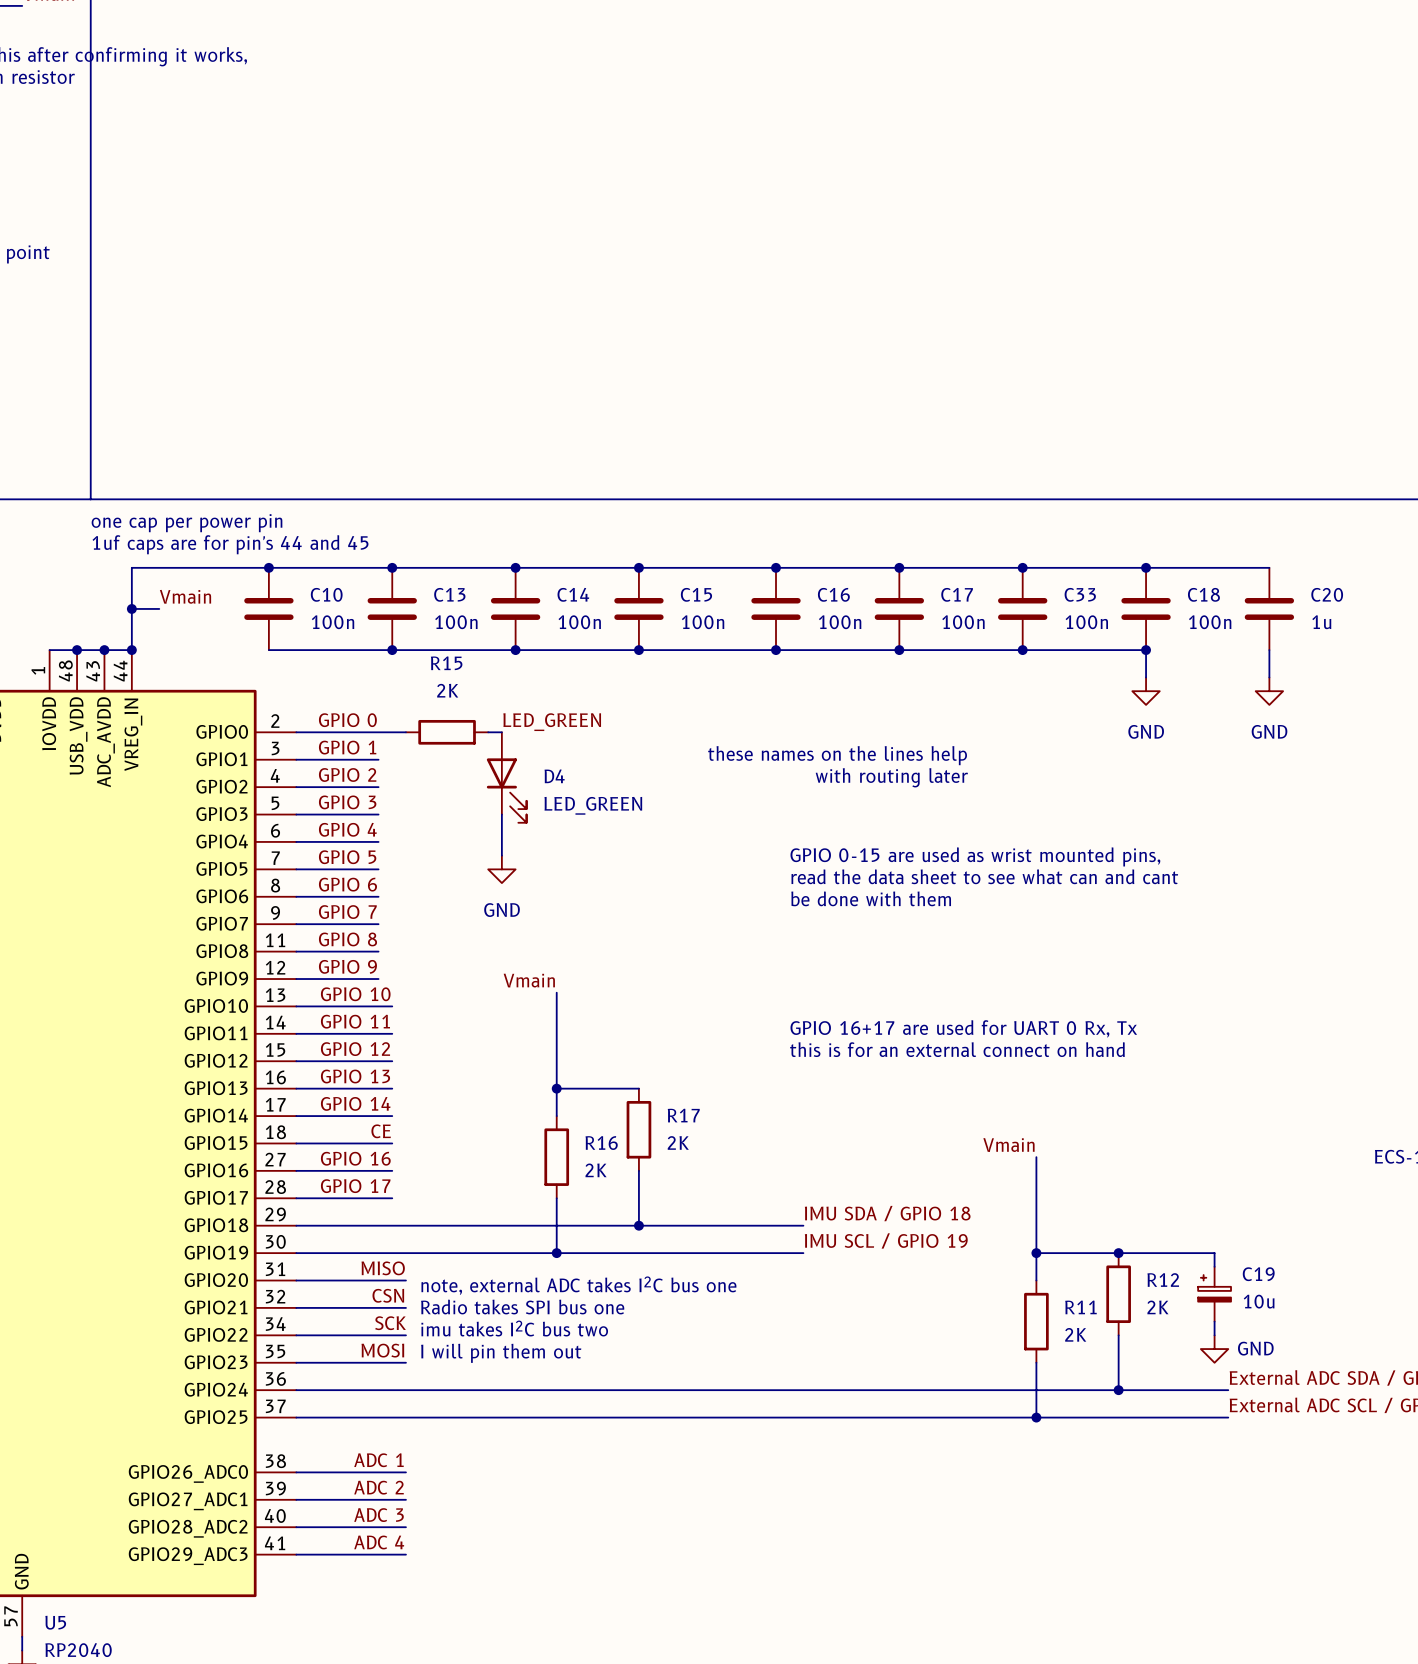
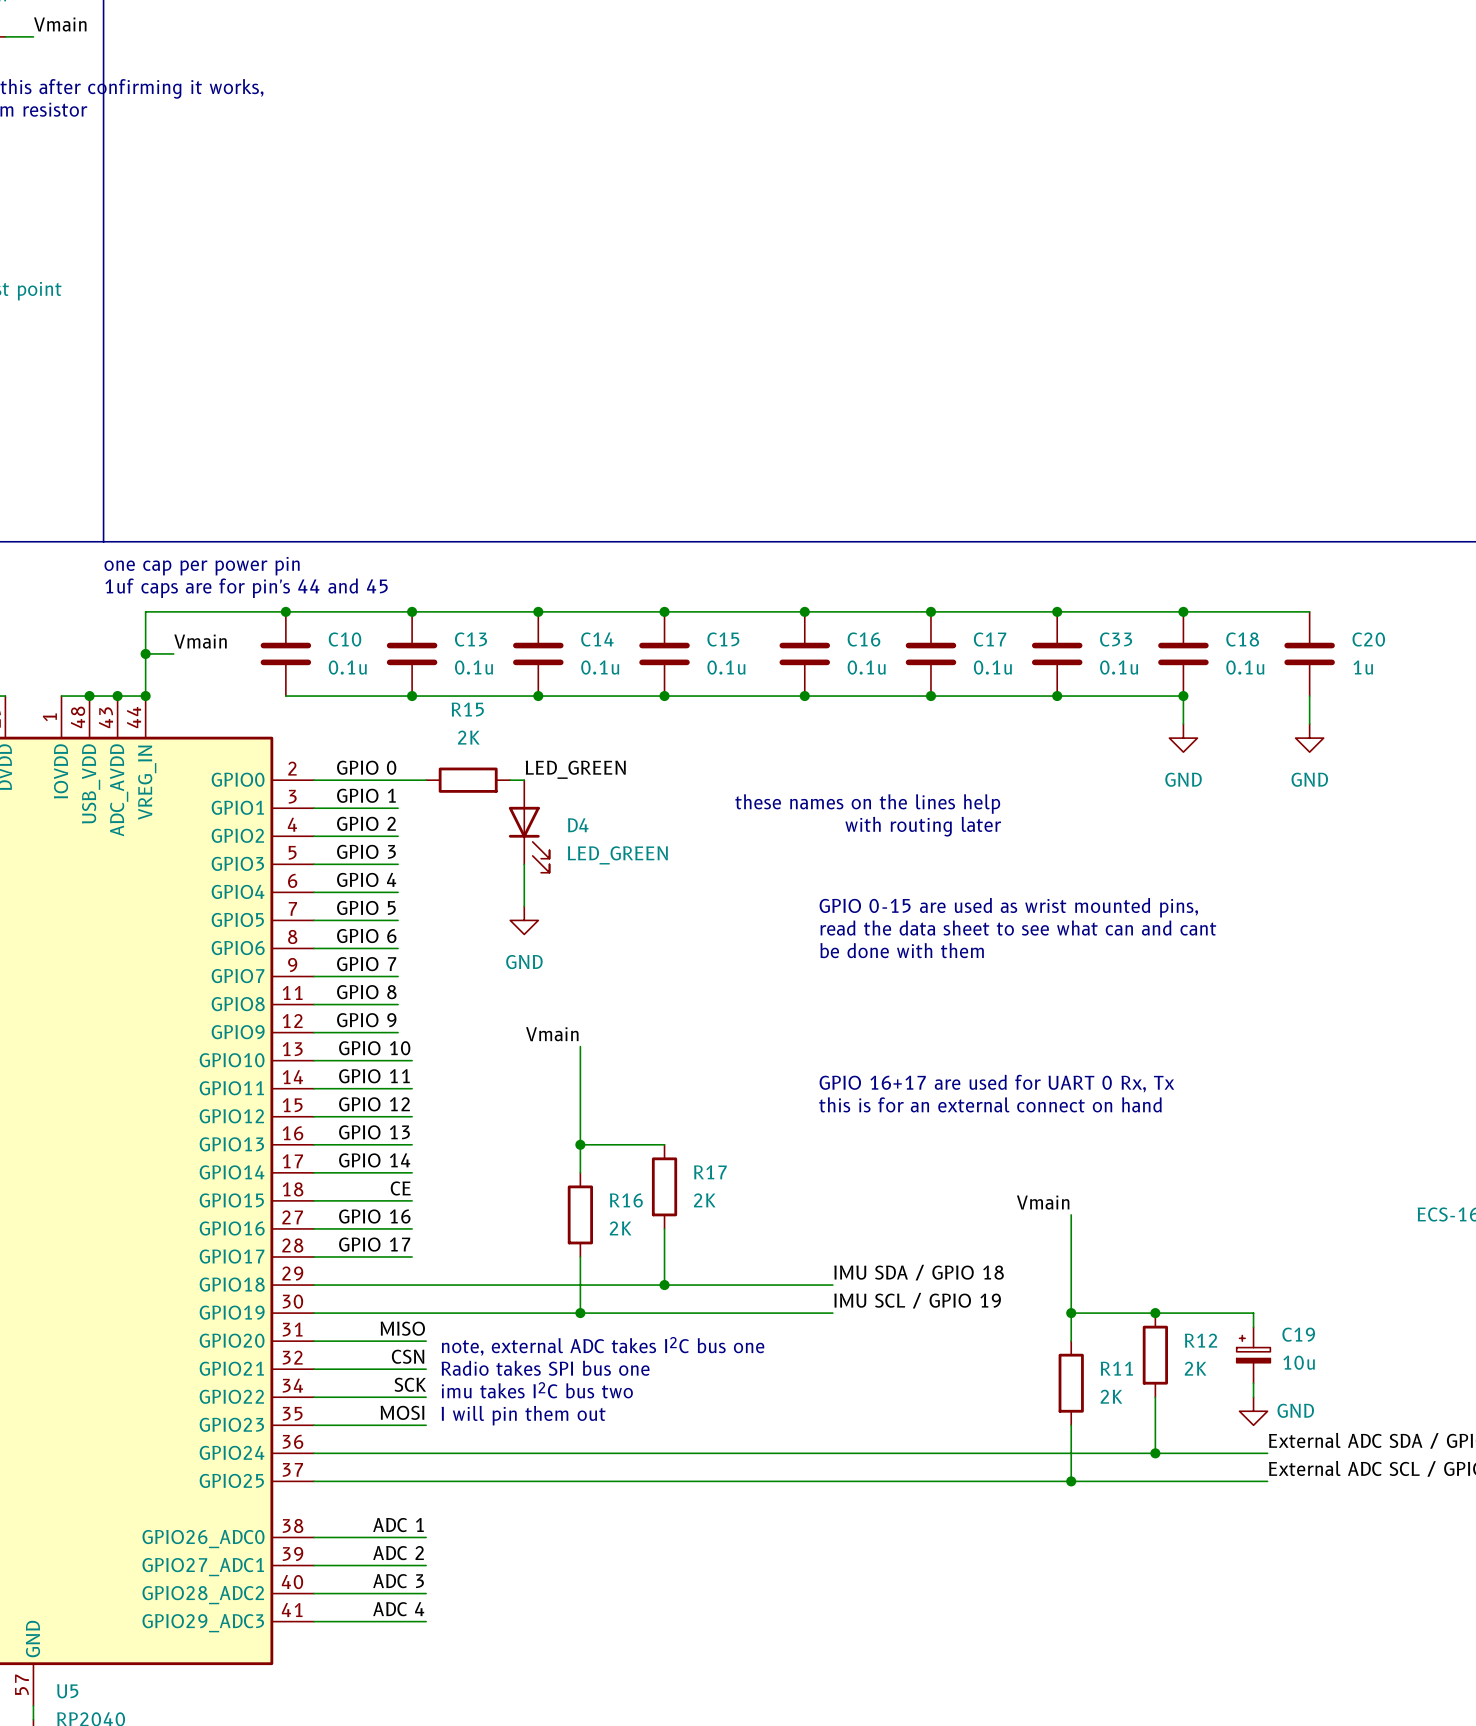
C10 value: 100n (333, 622) -> 0.1u (347, 667)
C13 value: 100n (456, 622) -> 0.1u (473, 667)
C14 value: 100n (579, 622) -> 0.1u (600, 667)
C15 value: 100n (703, 622) -> 0.1u (726, 667)
C16 value: 100n (840, 622) -> 0.1u (866, 667)
C17 value: 100n (963, 622) -> 0.1u (992, 667)
C33 value: 100n (1086, 622) -> 0.1u (1119, 667)
C18 value: 100n (1210, 622) -> 0.1u (1245, 667)

